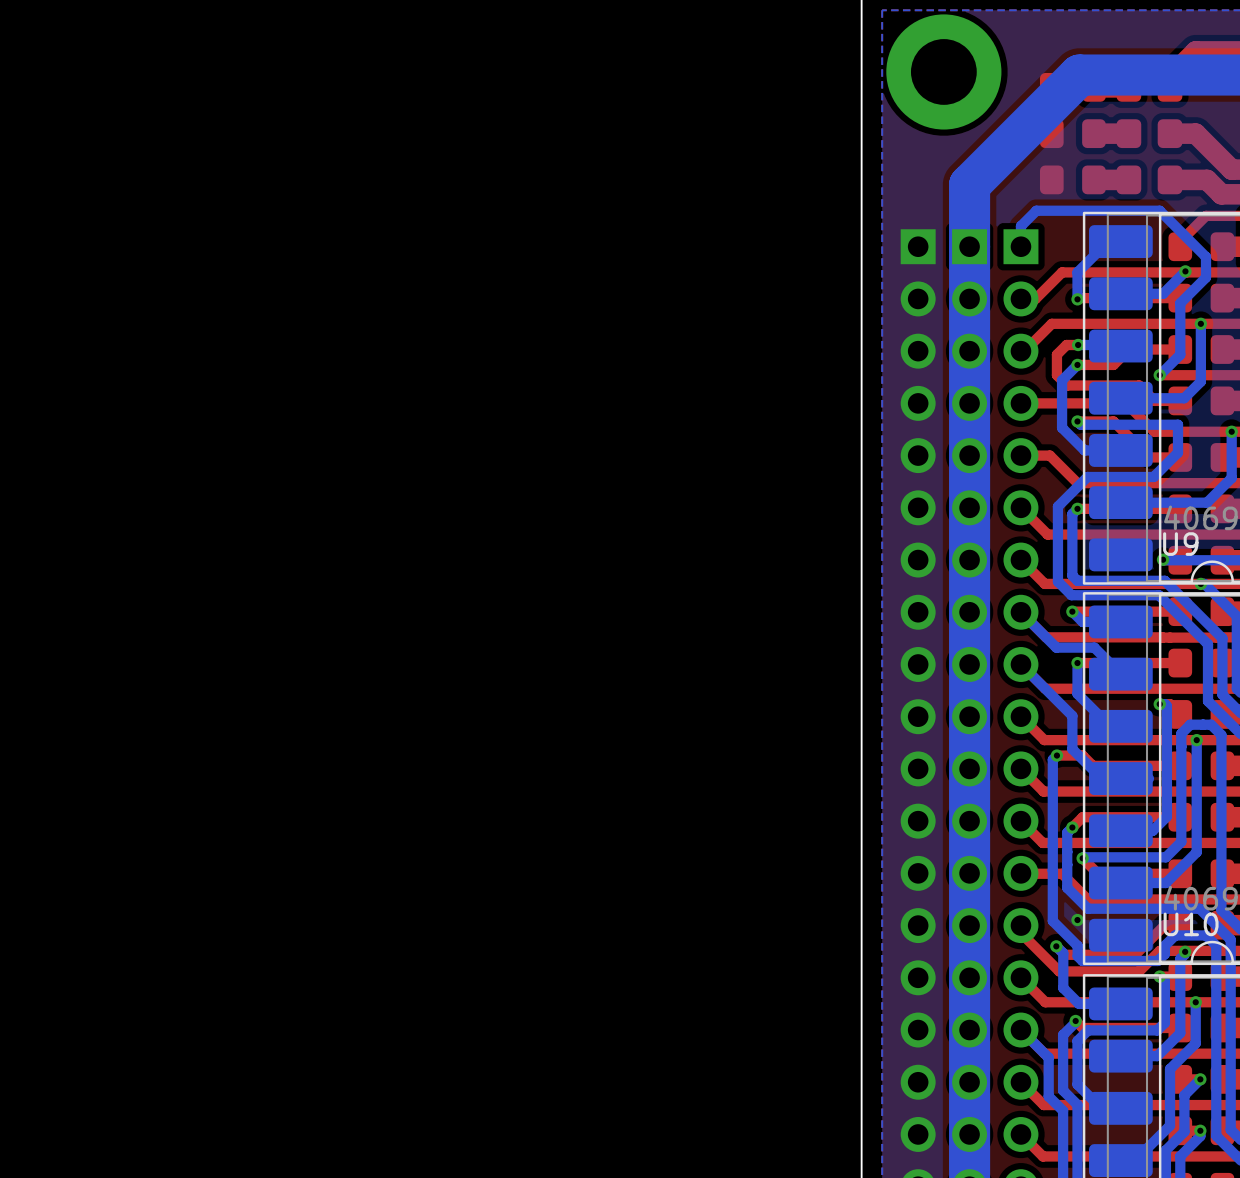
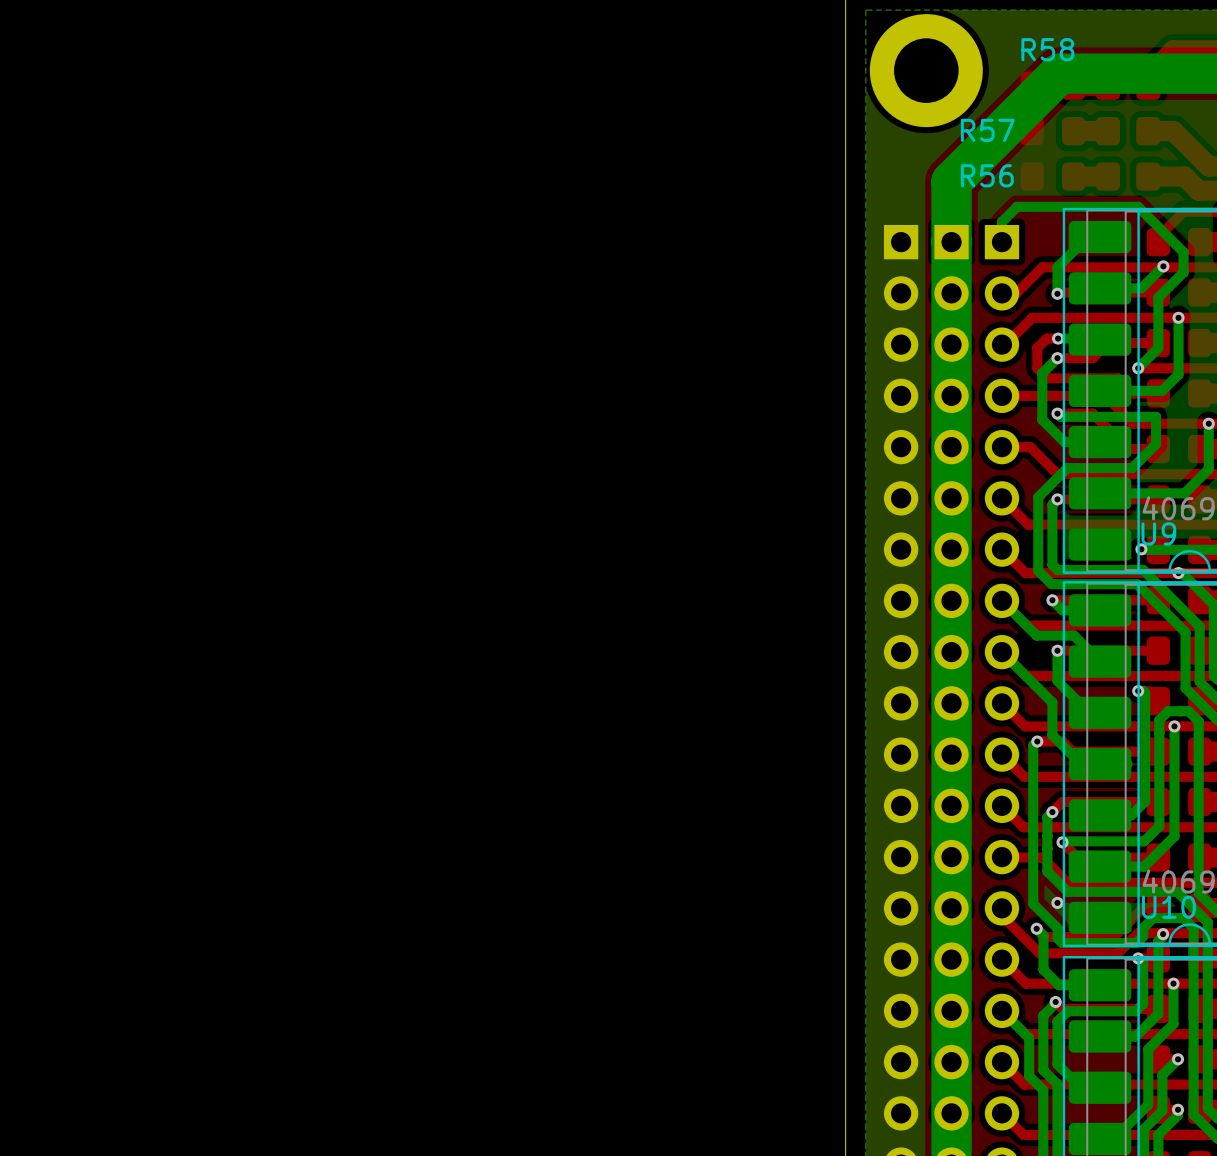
R58 name: none -> R58 (1047, 49)
R57 name: none -> R57 (987, 130)
R56 name: none -> R56 (987, 175)

